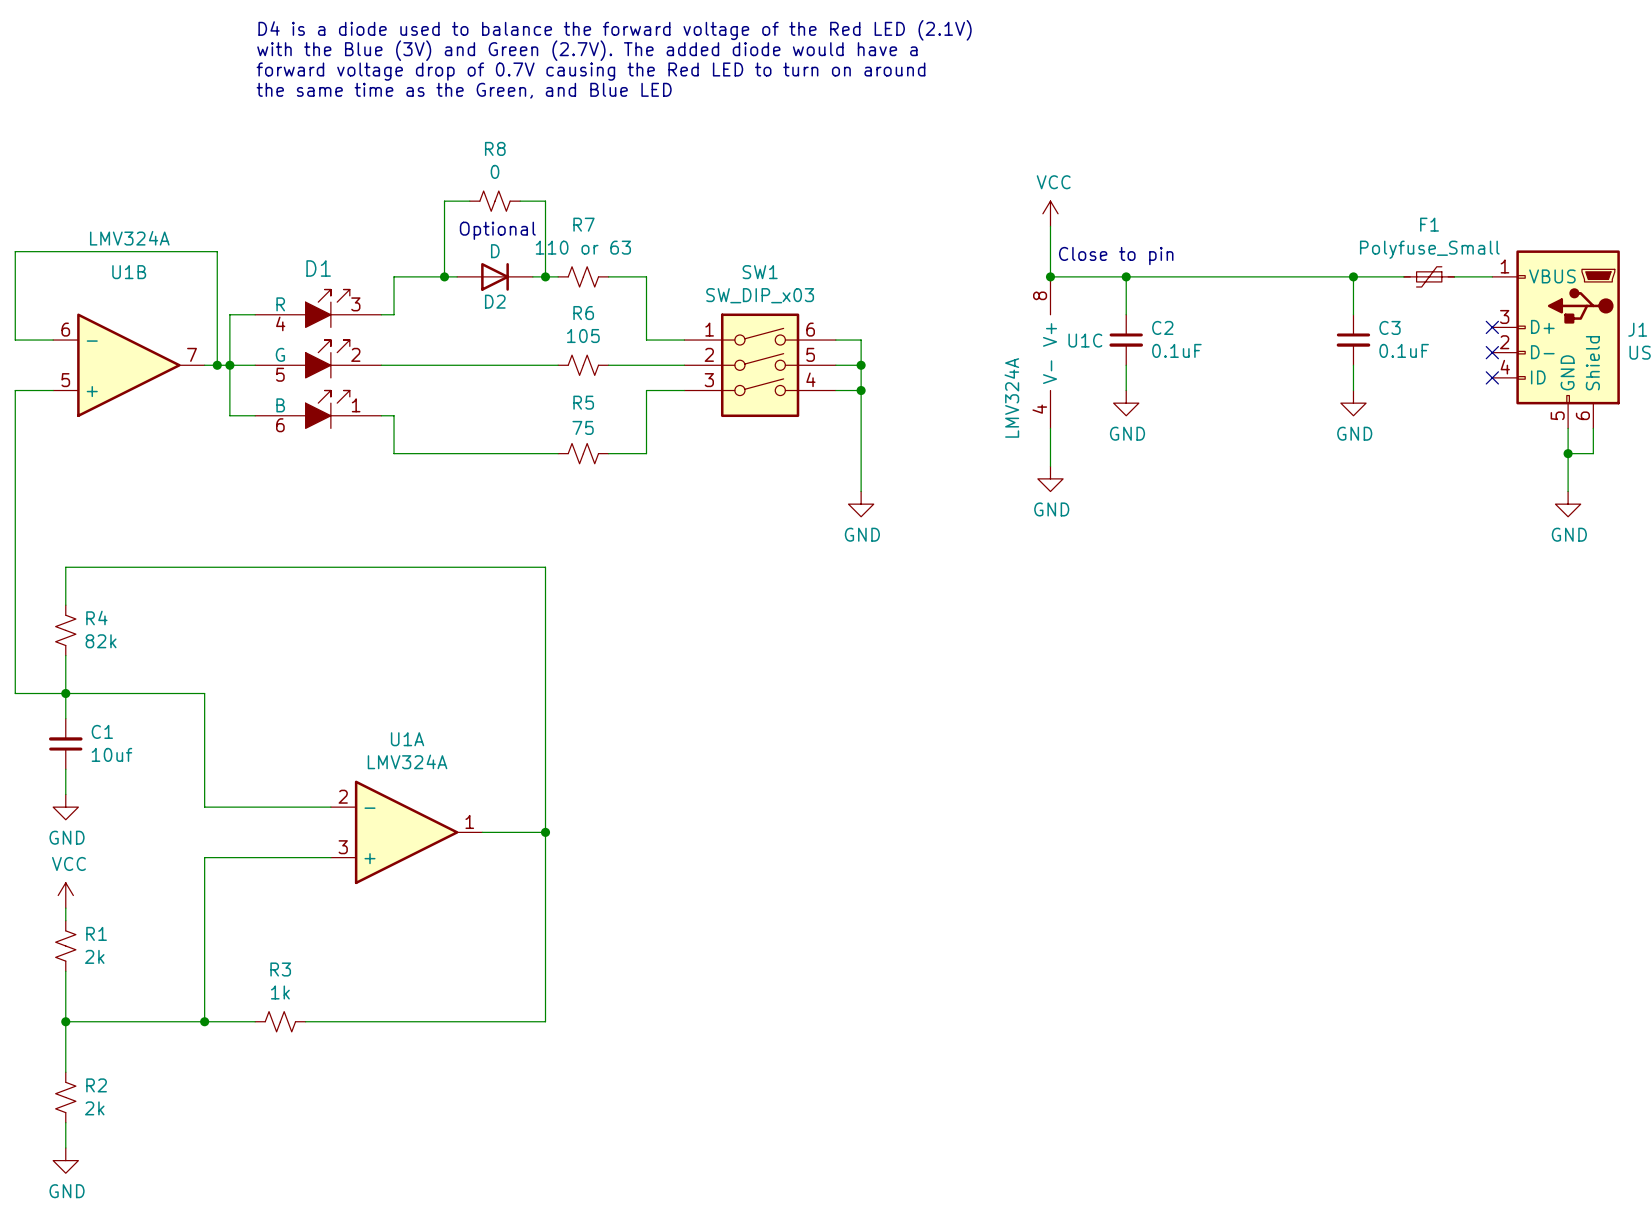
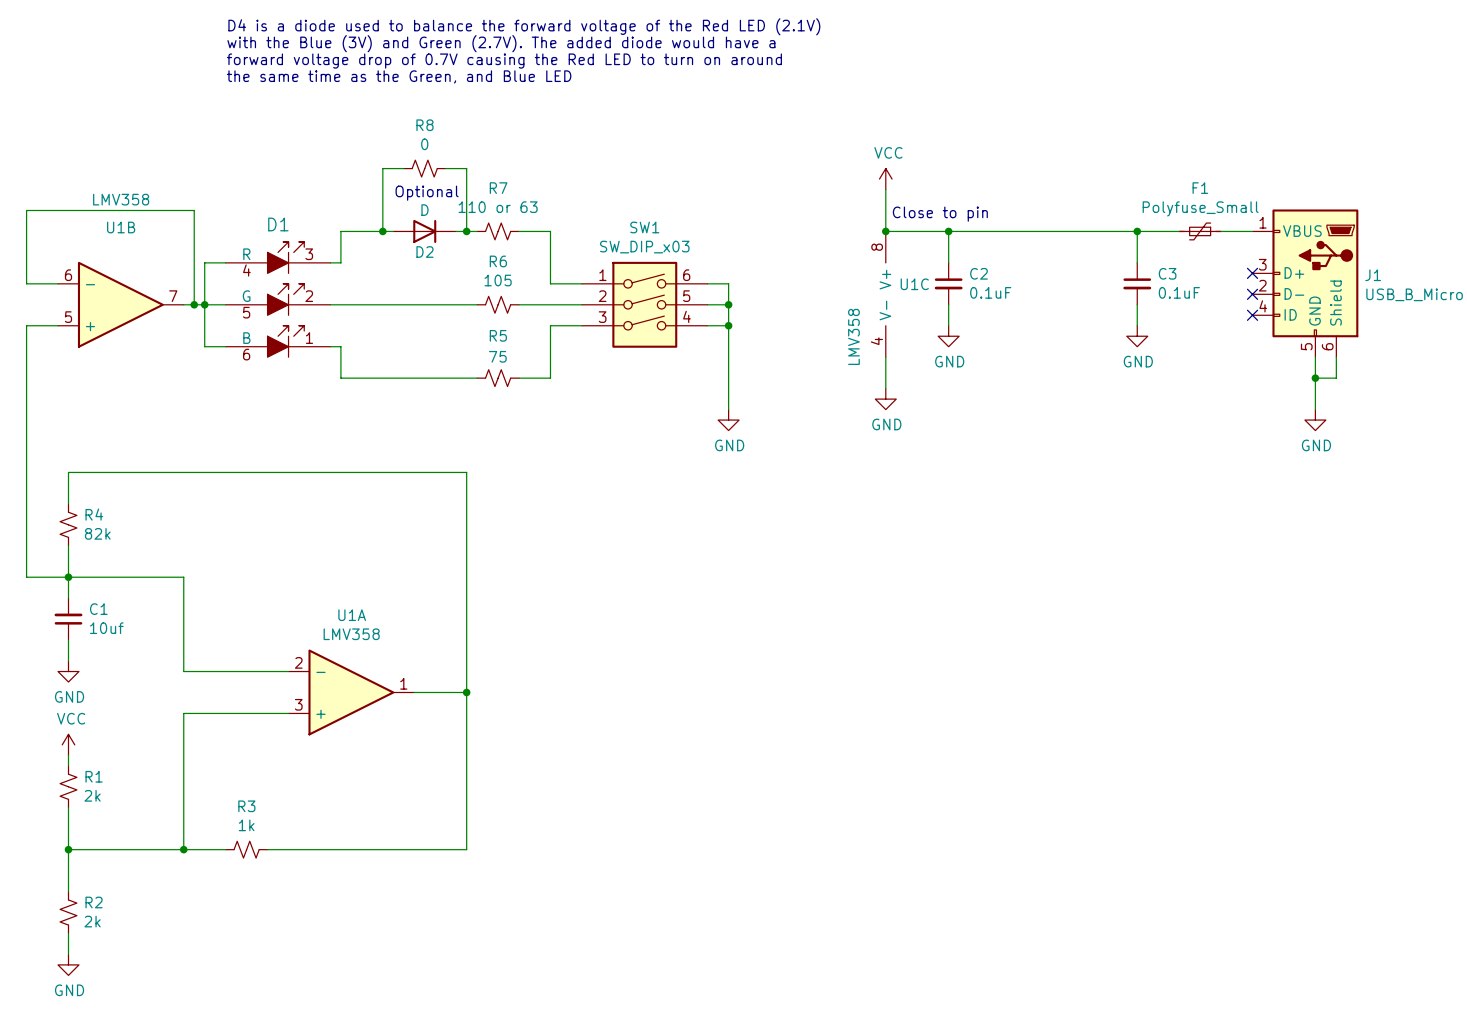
U1B value: LMV324A (129, 238) -> LMV358 (121, 199)
U1C value: LMV324A (1011, 397) -> LMV358 (853, 336)
U1A value: LMV324A (407, 761) -> LMV358 (351, 634)

